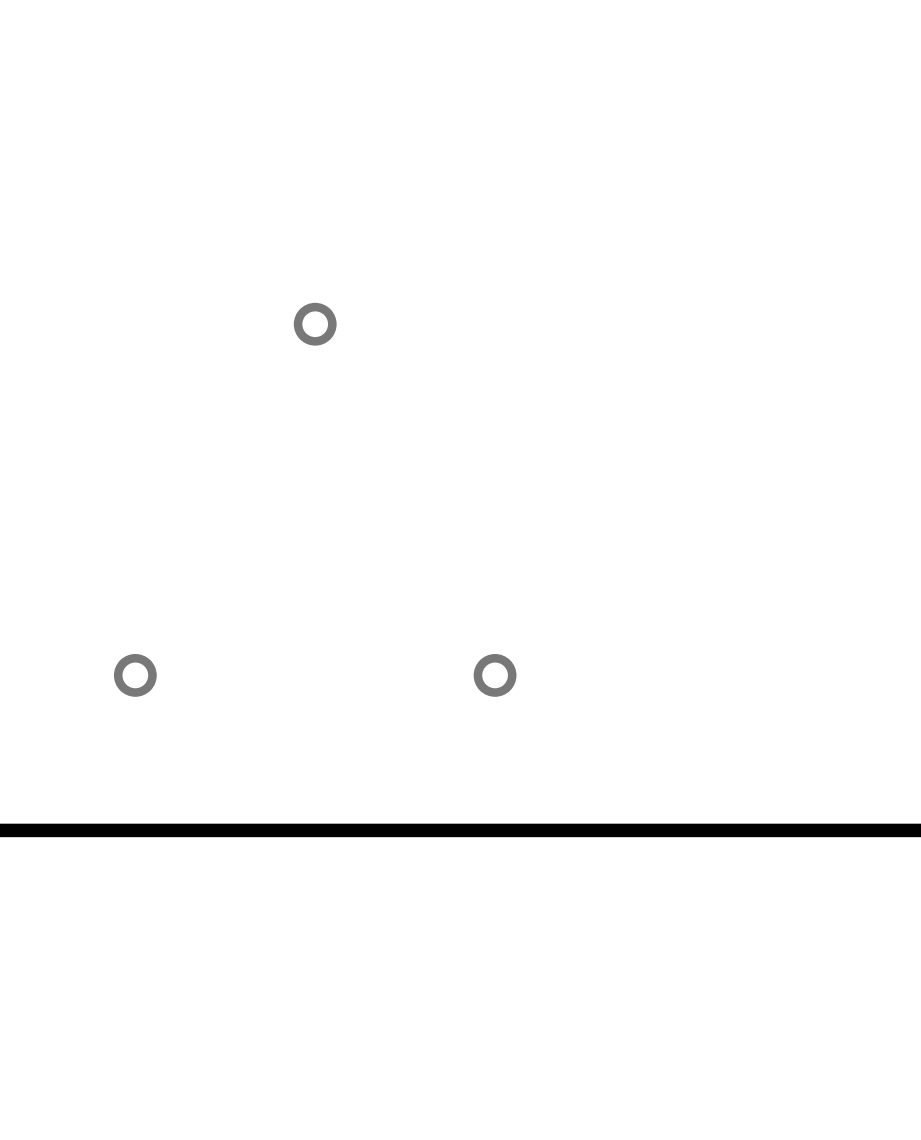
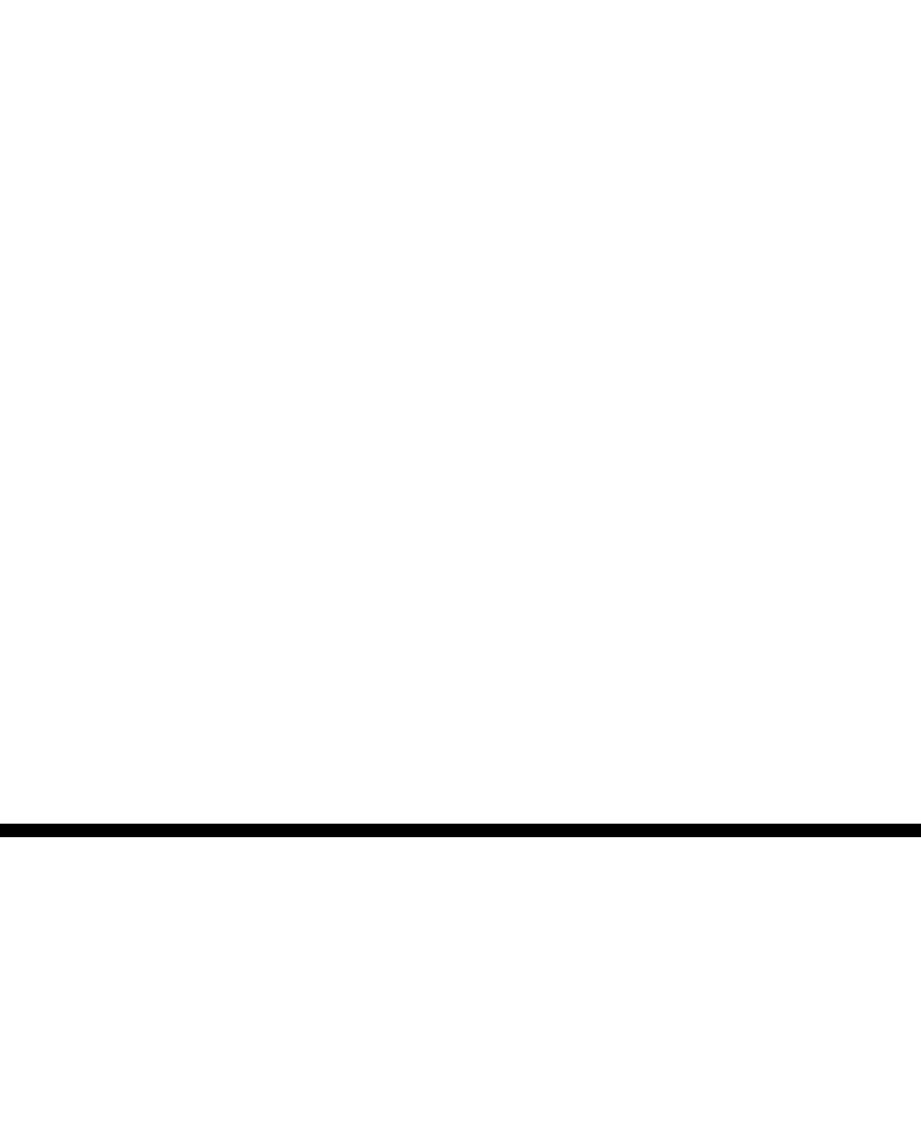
via: (315, 324) -> none
via: (135, 675) -> none
via: (495, 675) -> none

